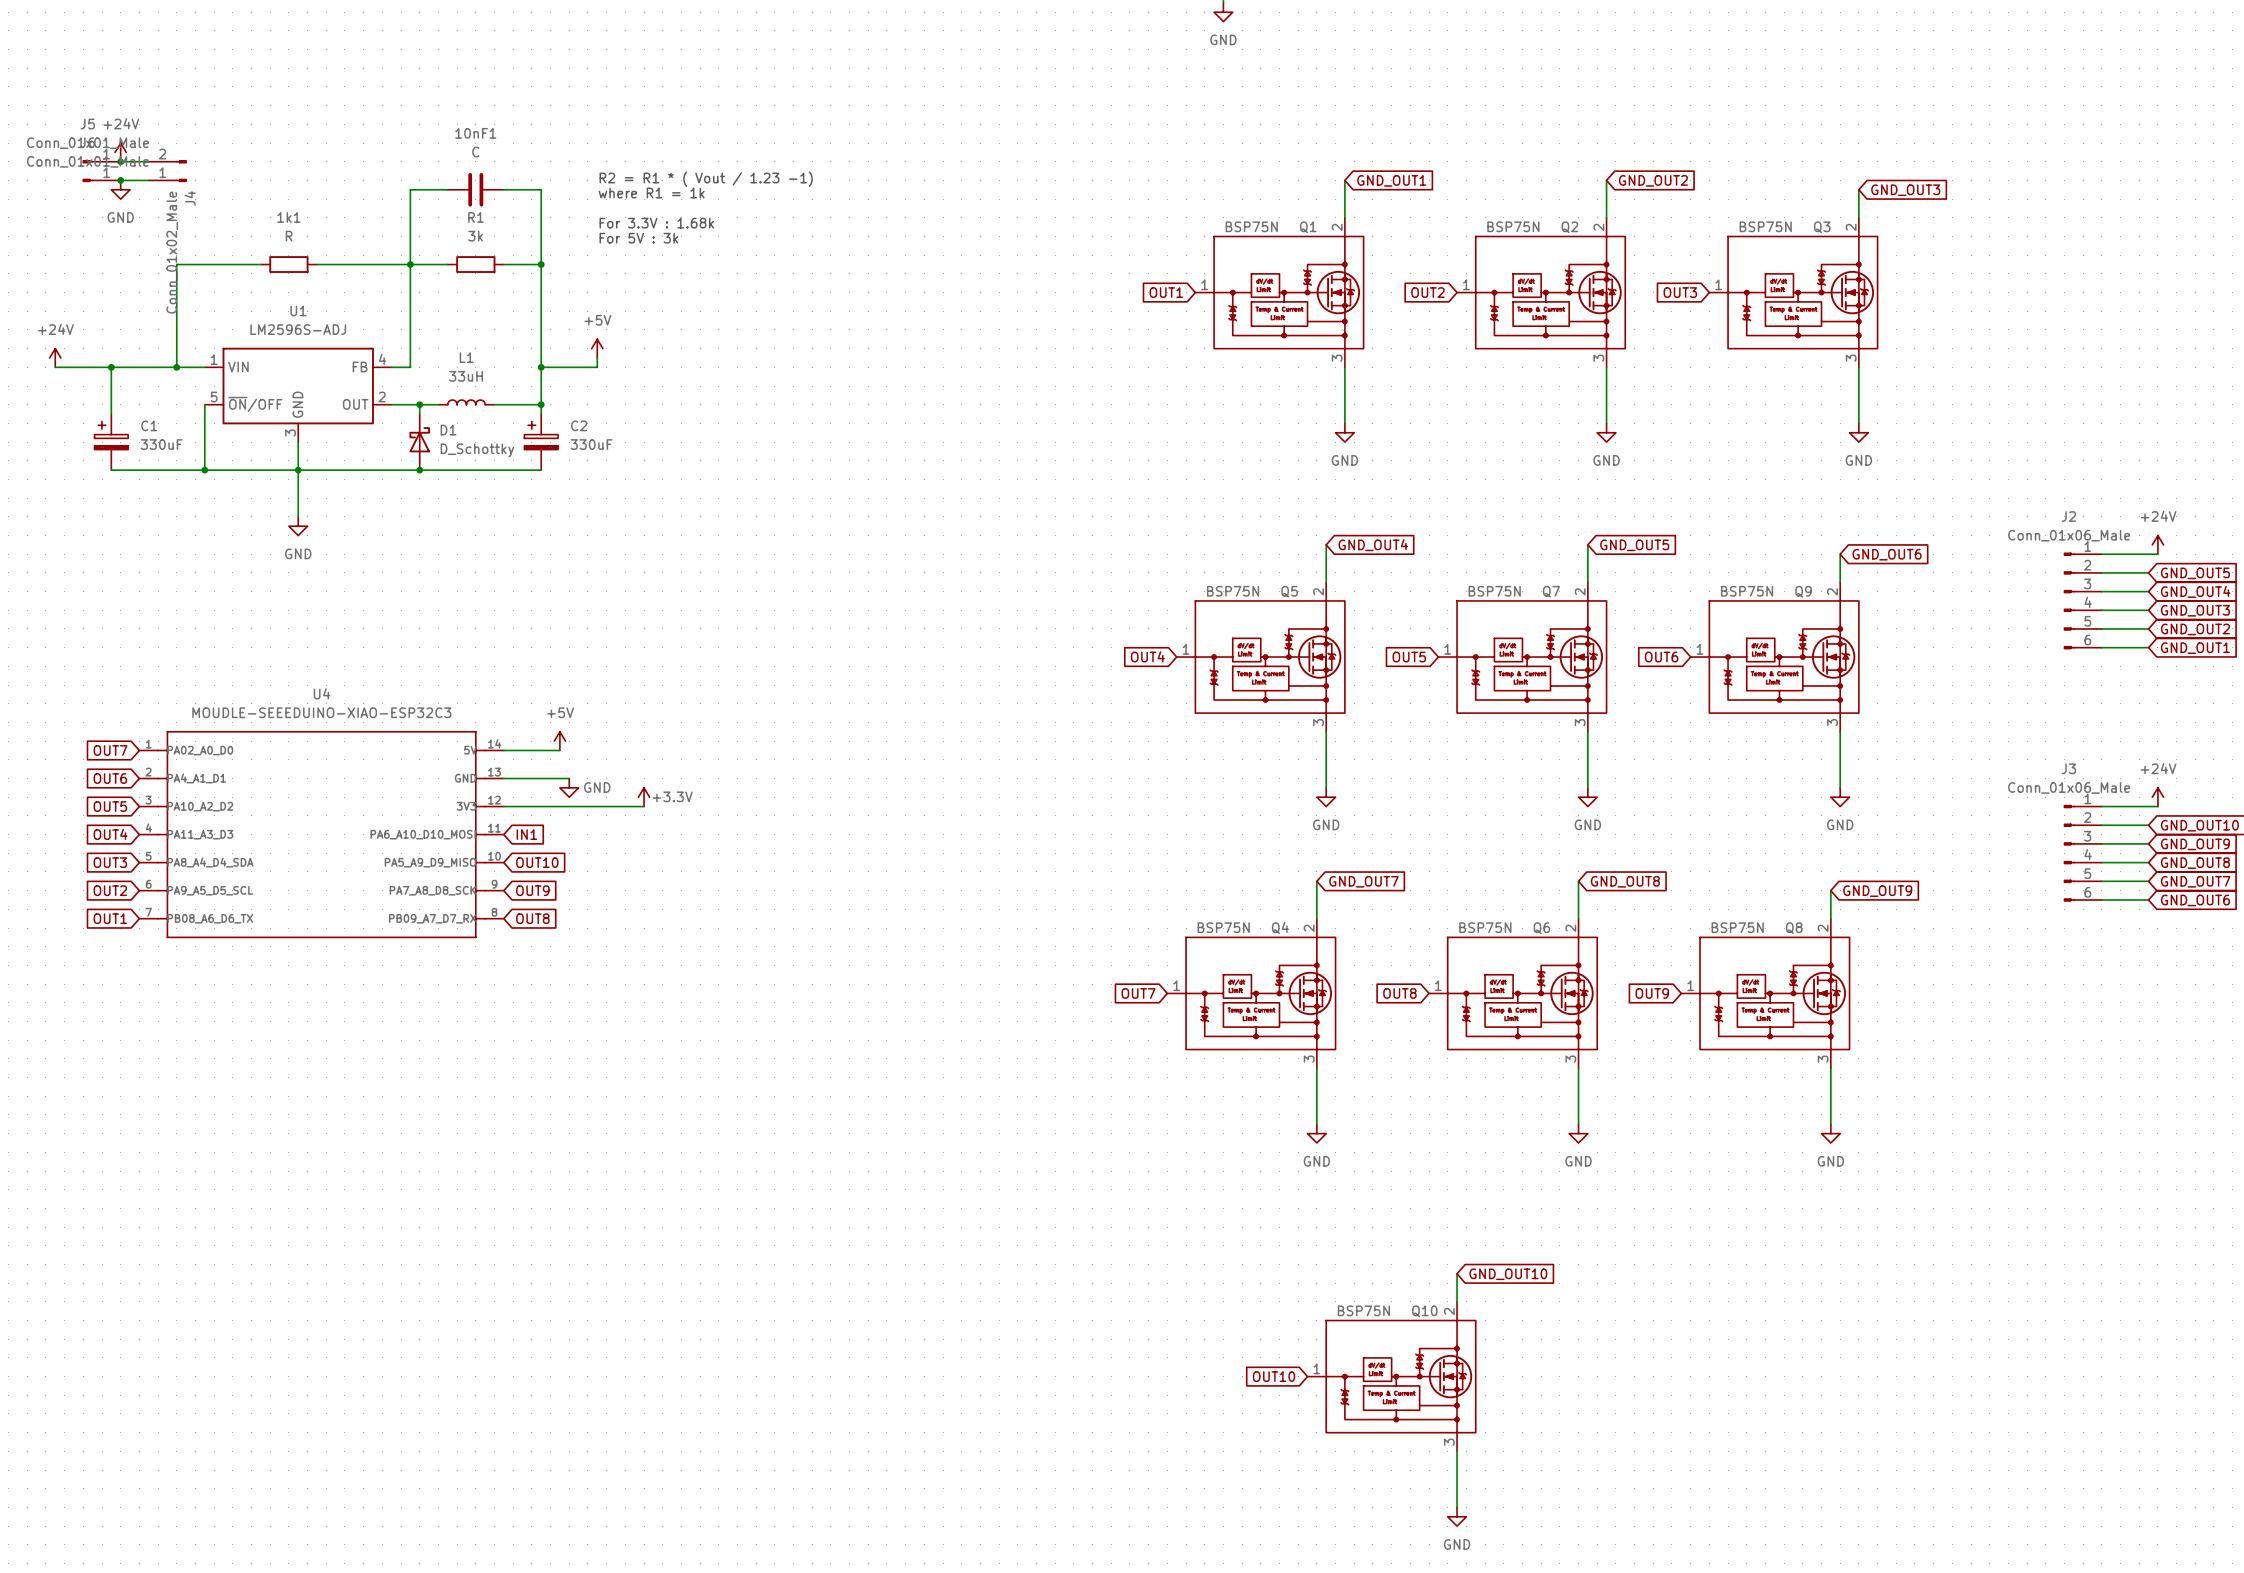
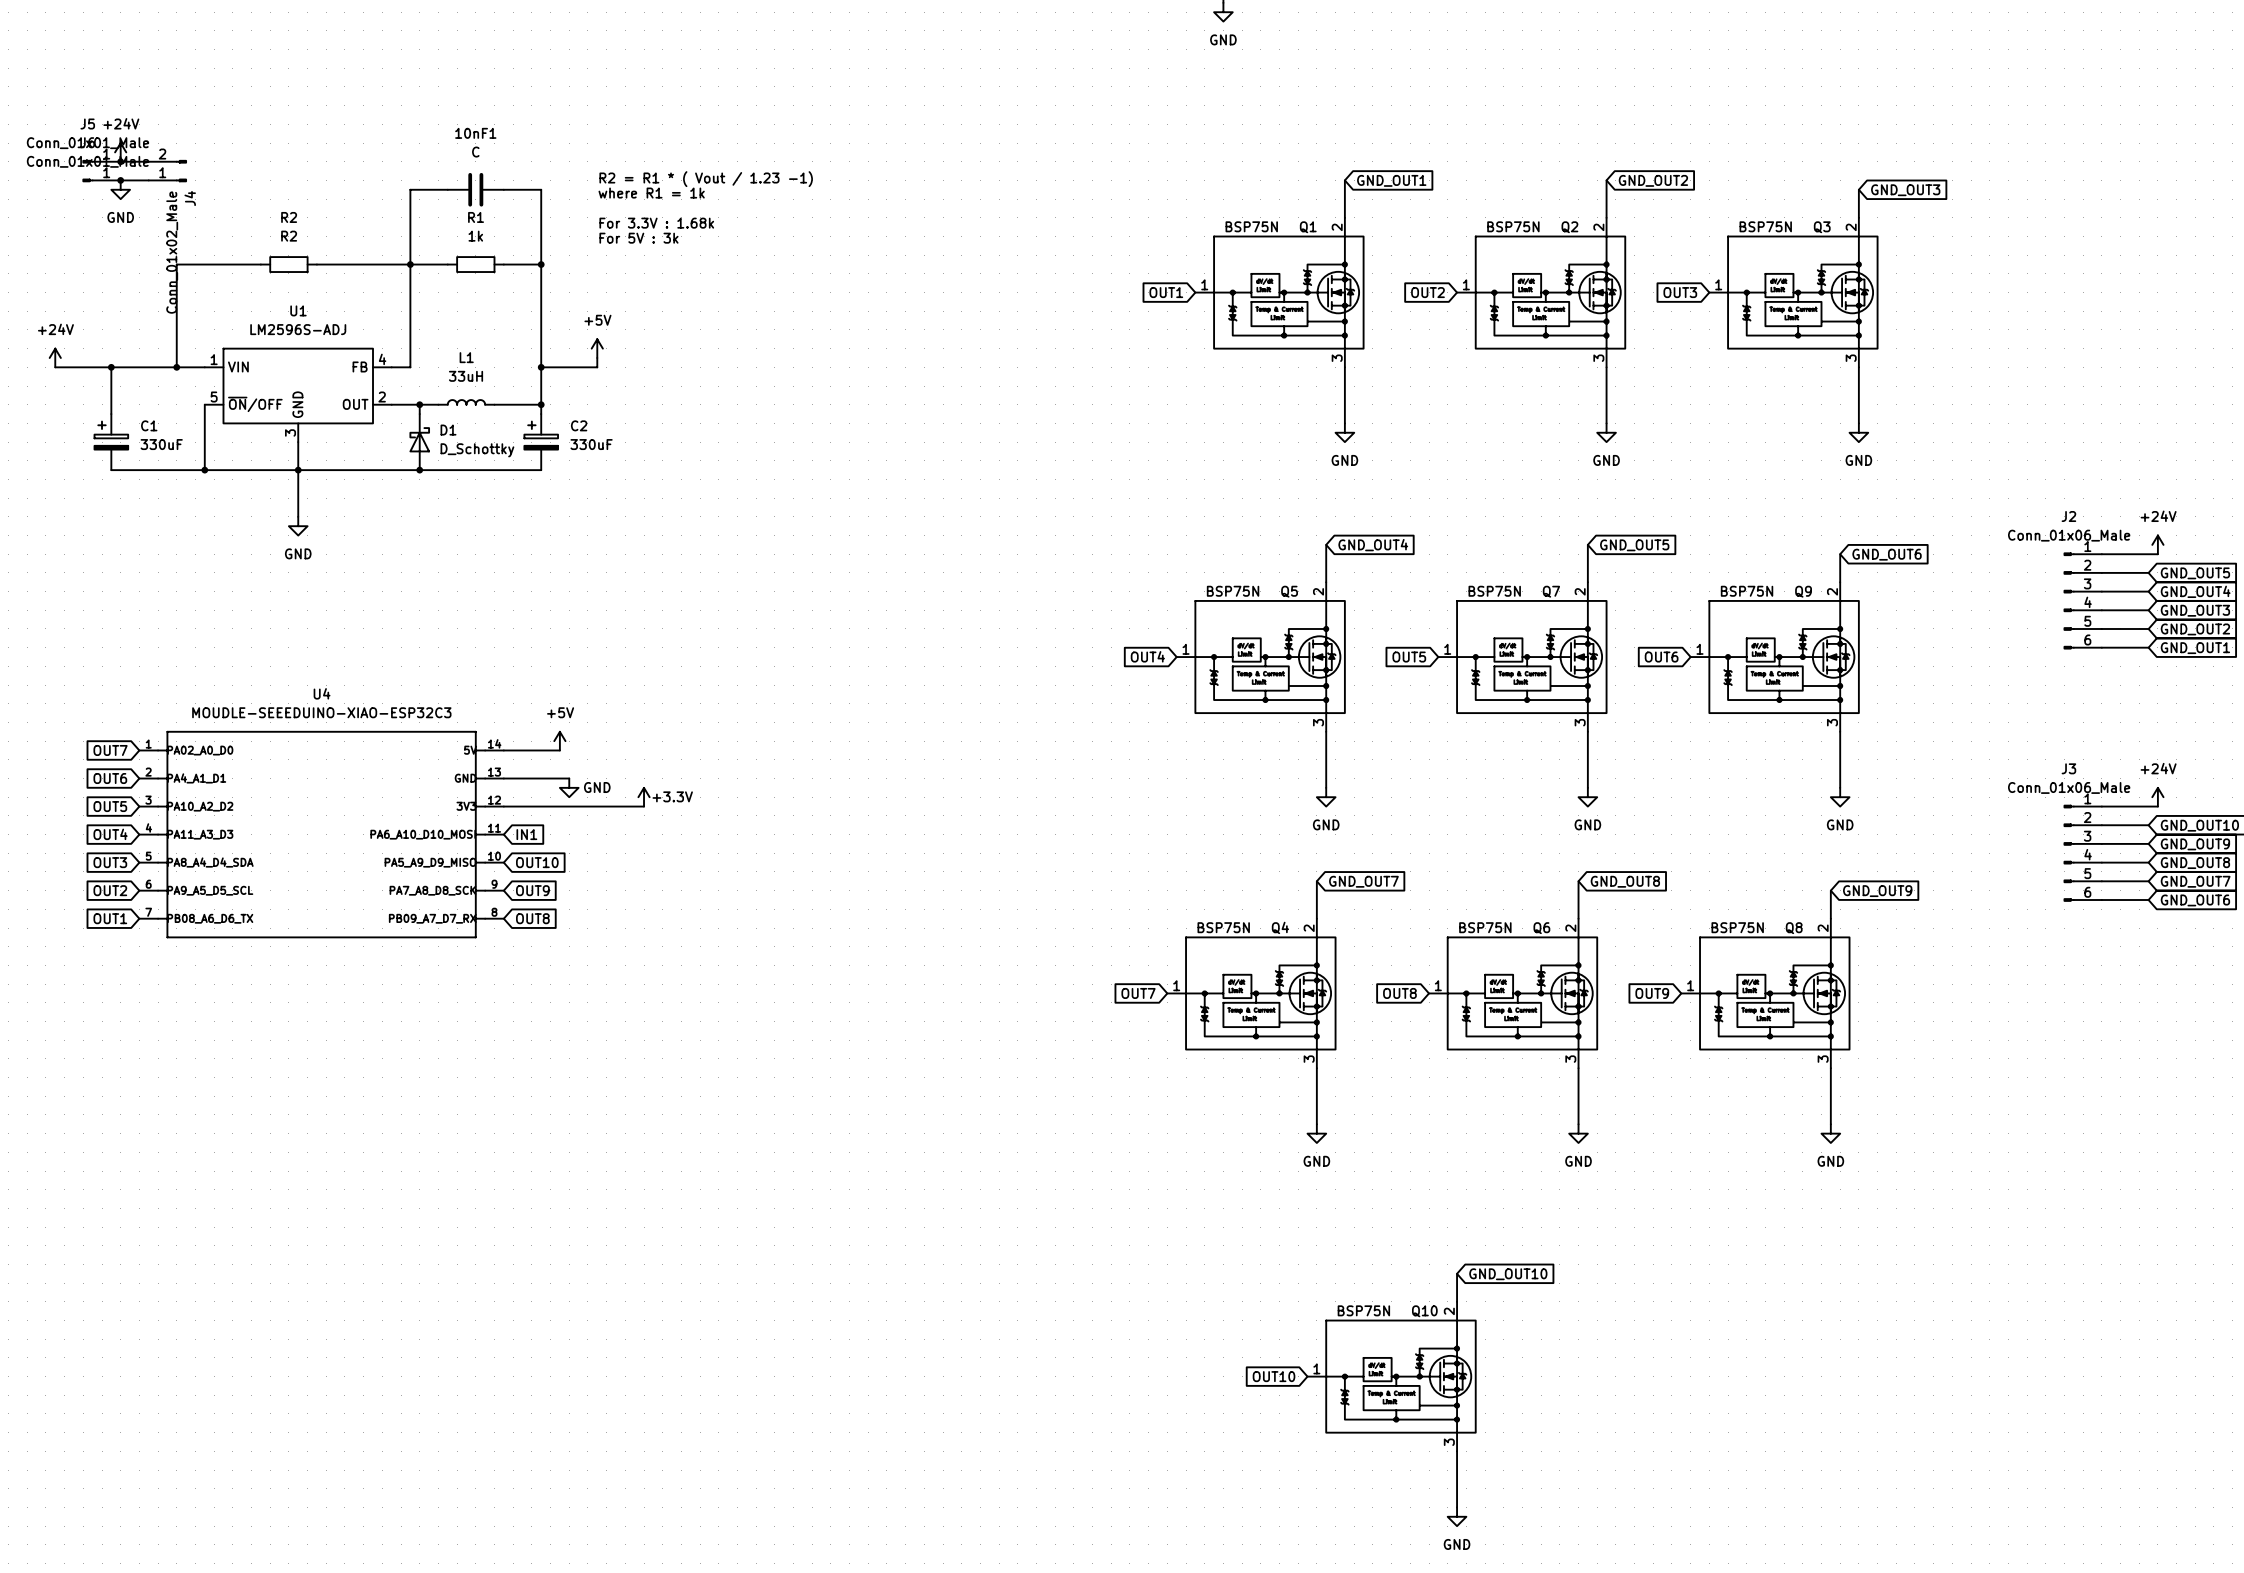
1k1 name: 1k1 (288, 217) -> R2 (289, 217)
1k1 value: R (289, 236) -> R2 (289, 236)
R1 value: 3k (475, 236) -> 1k (475, 236)

